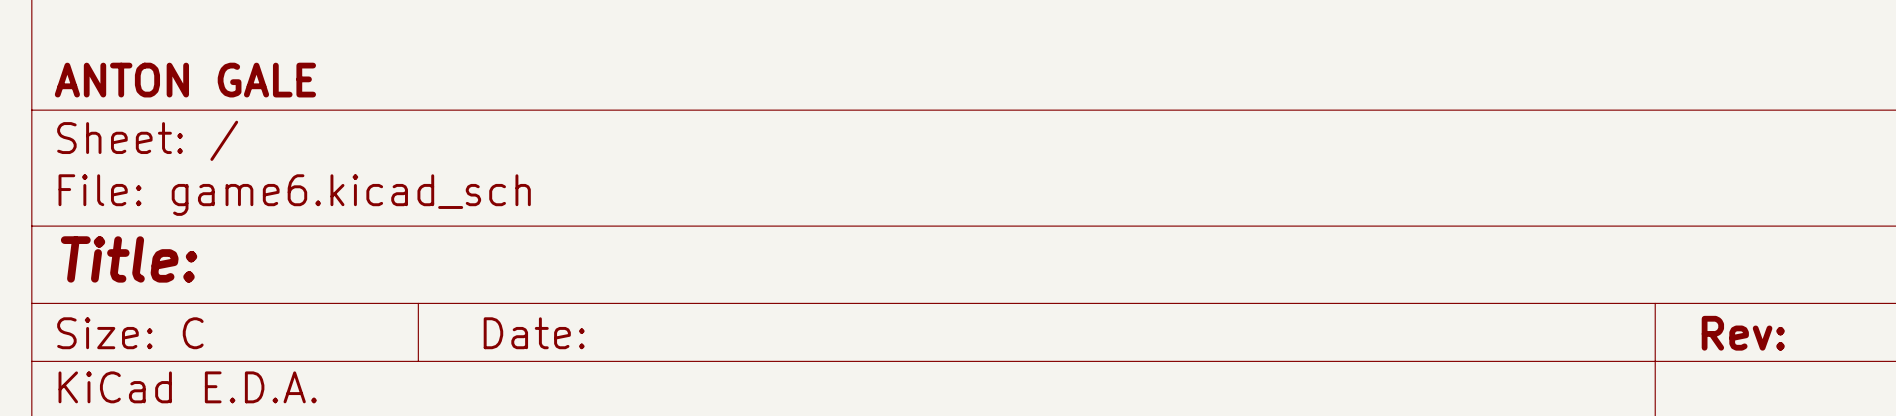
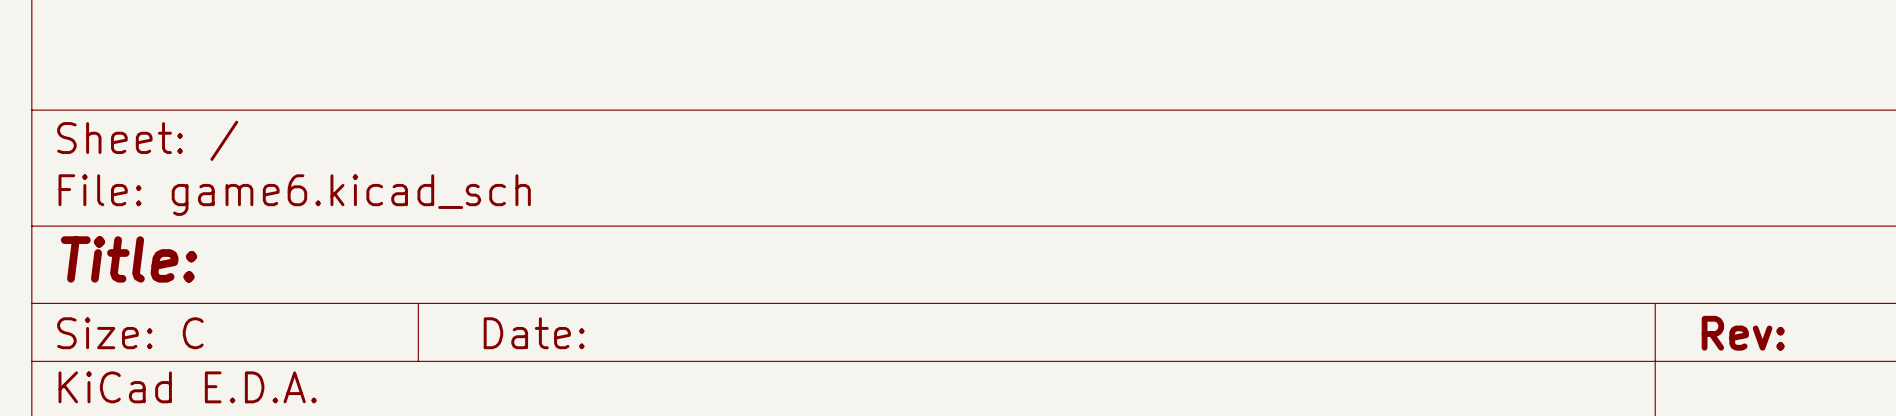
title block: ANTON GALE (185, 80) -> none

